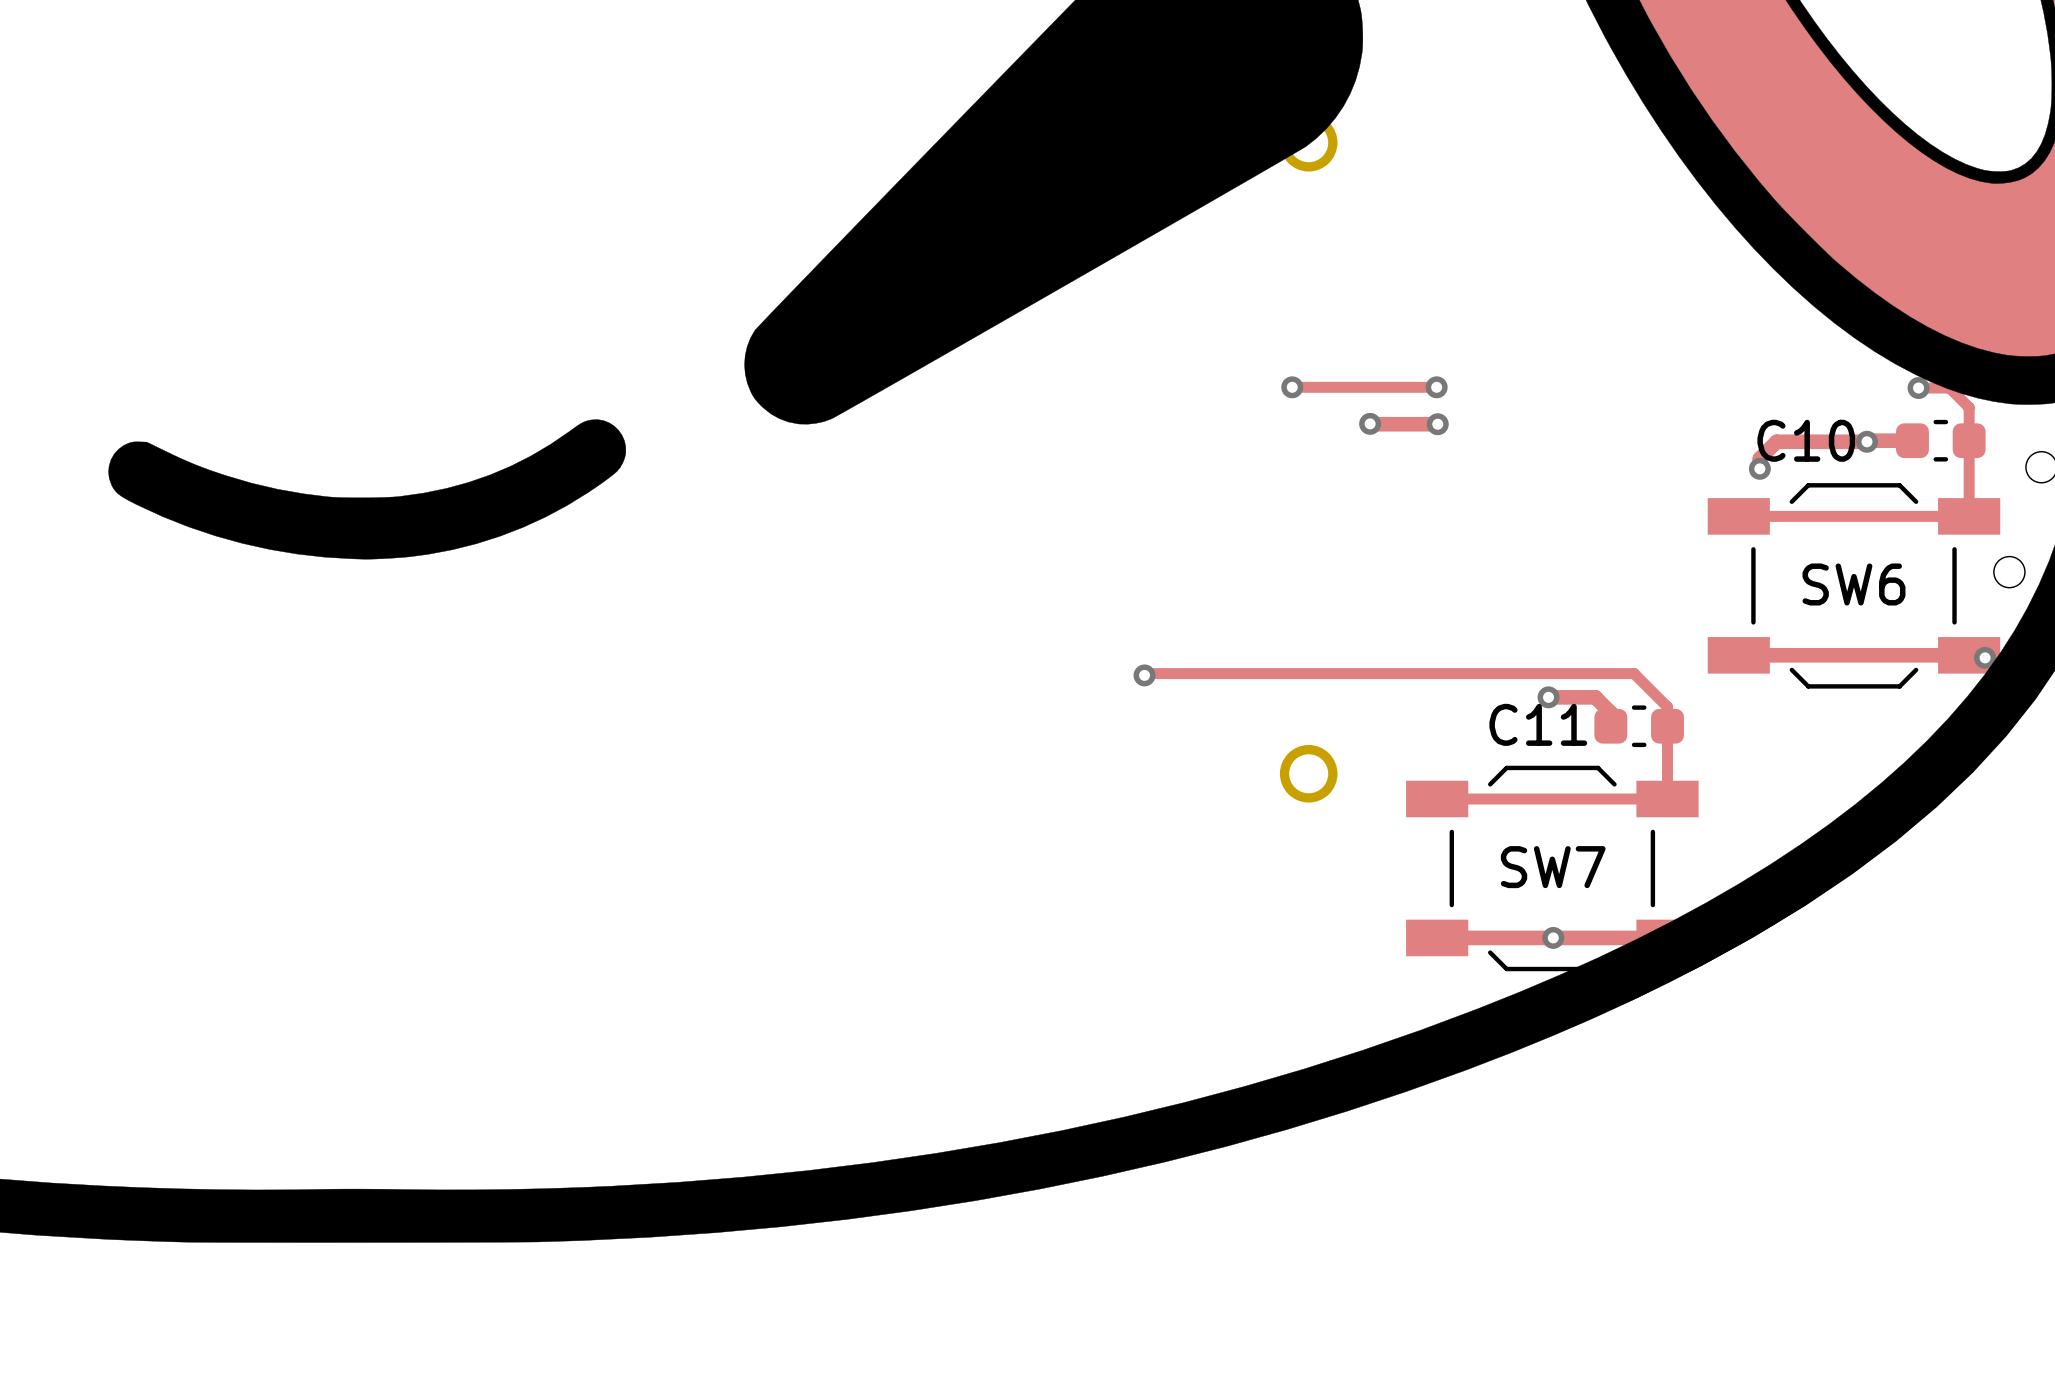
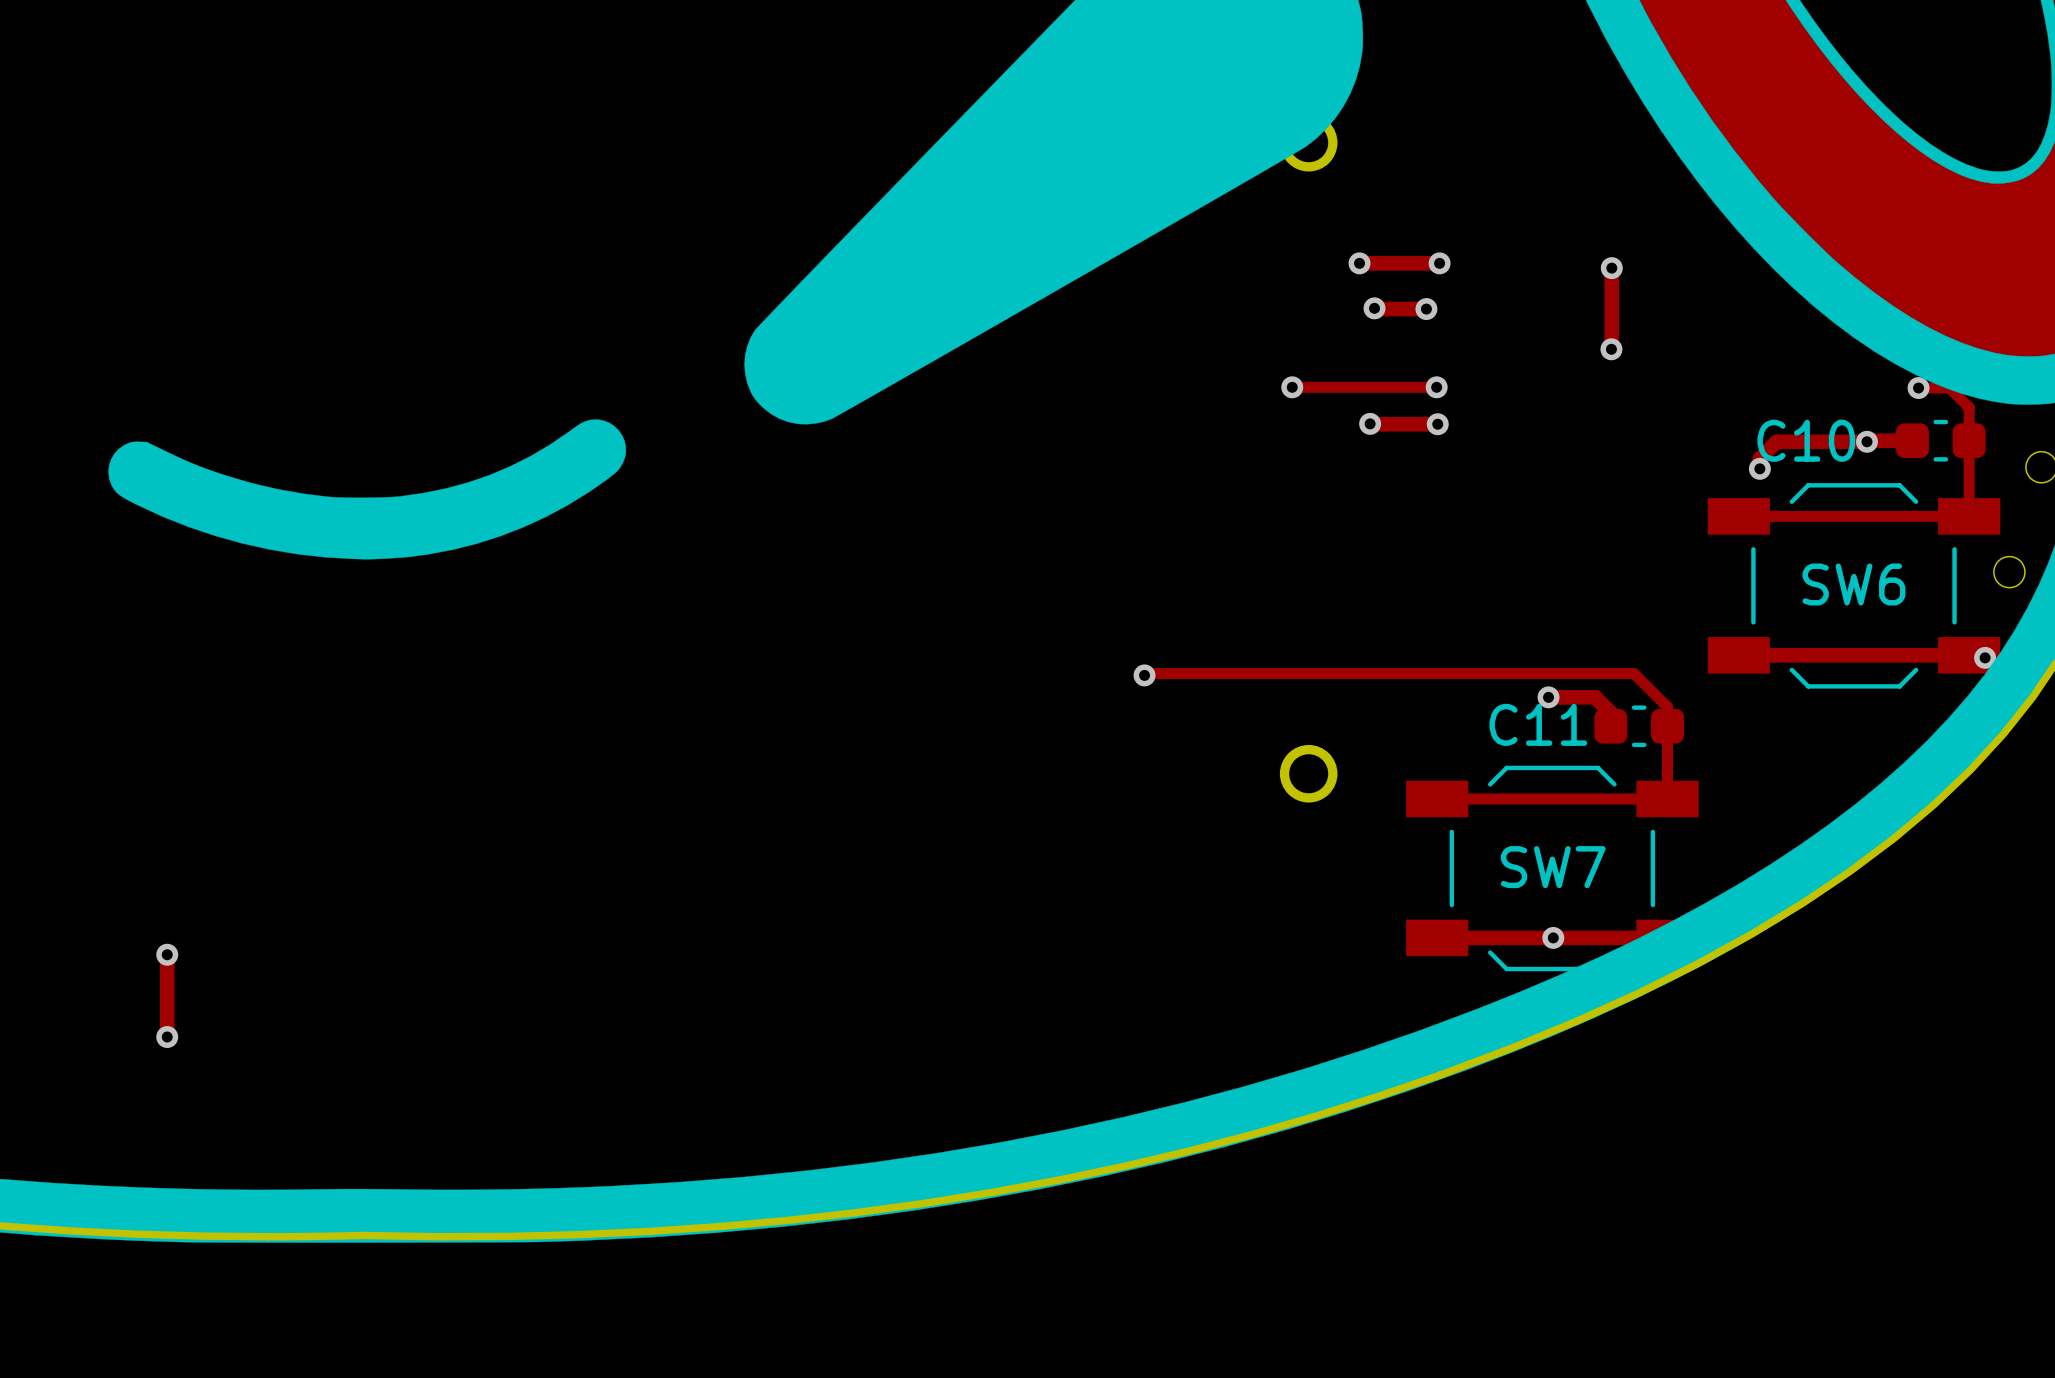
track: none -> (1359, 263) (1439, 263)
via: none -> (1359, 263)
via: none -> (1439, 263)
track: none -> (1611, 268) (1611, 348)
via: none -> (1611, 268)
track: none -> (1374, 308) (1426, 309)
via: none -> (1374, 308)
via: none -> (1426, 309)
via: none -> (1611, 349)
track: none -> (167, 954) (167, 1037)
via: none -> (167, 954)
via: none -> (167, 1037)

